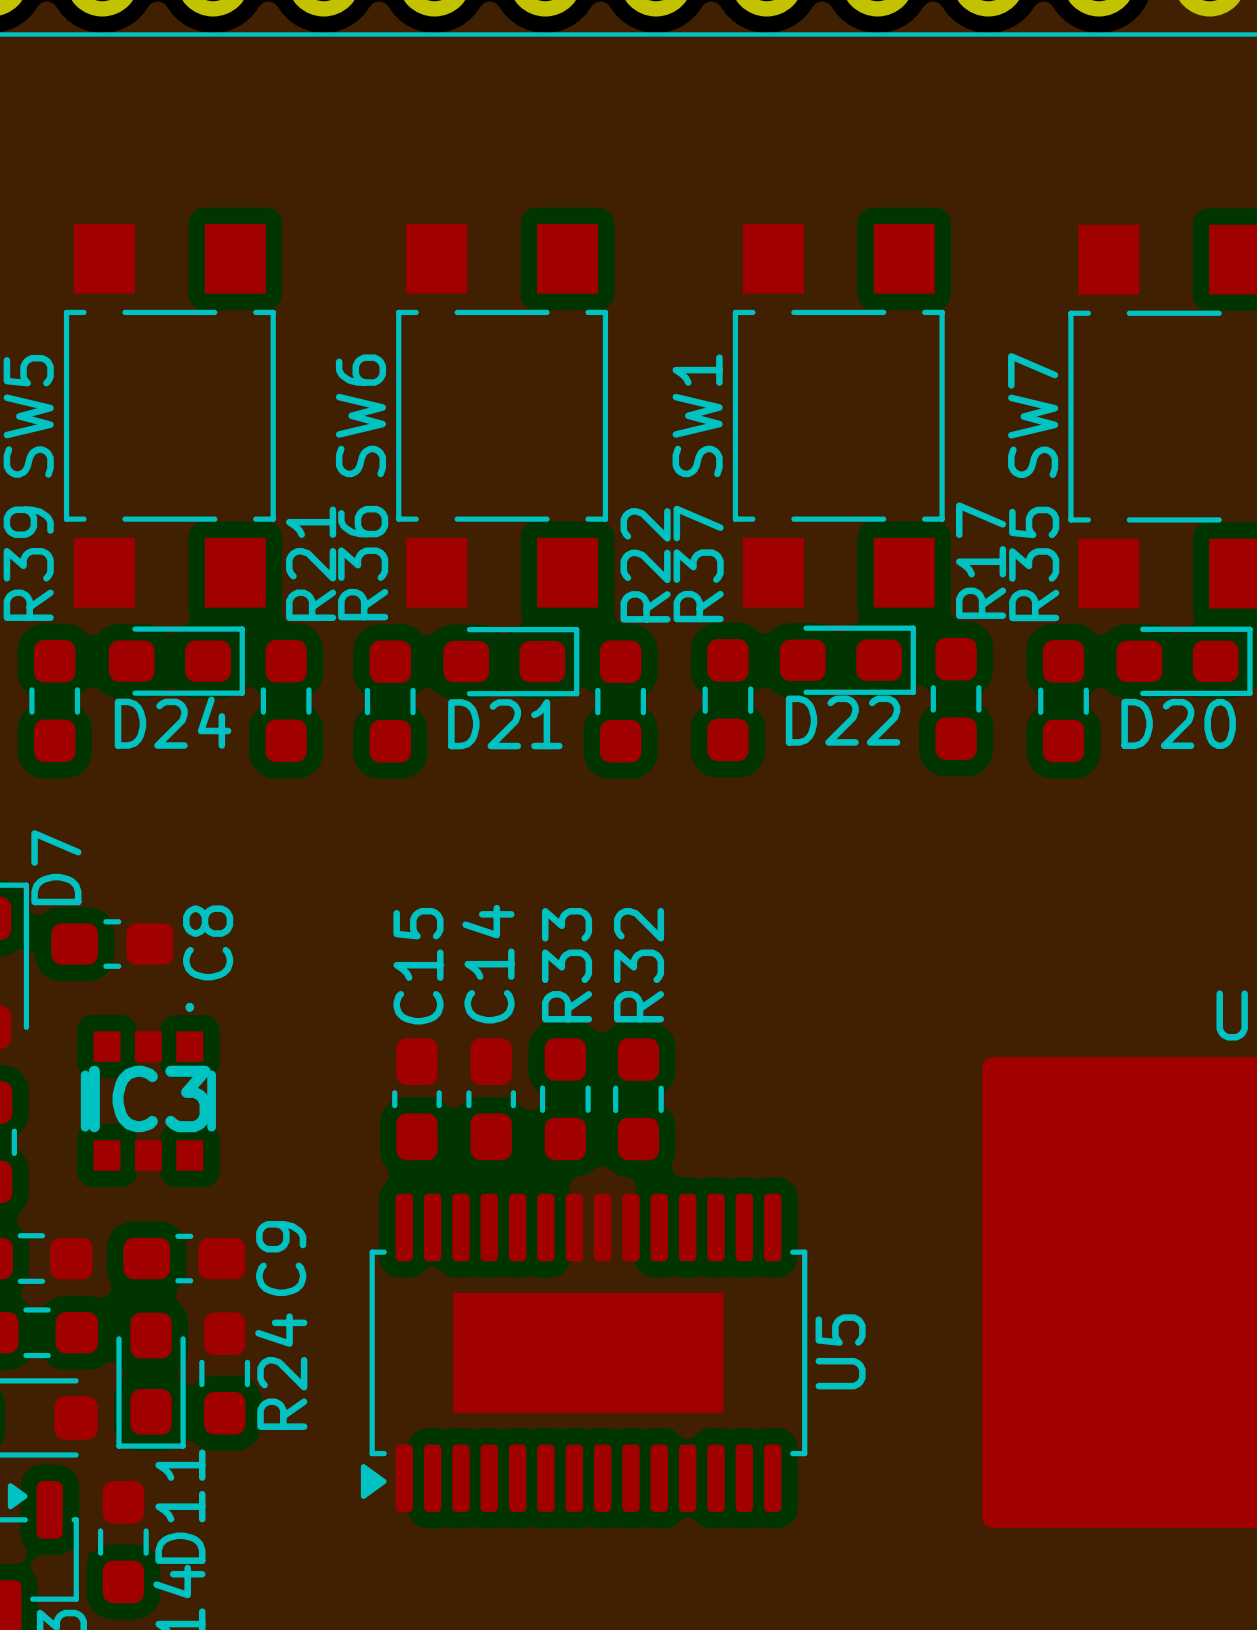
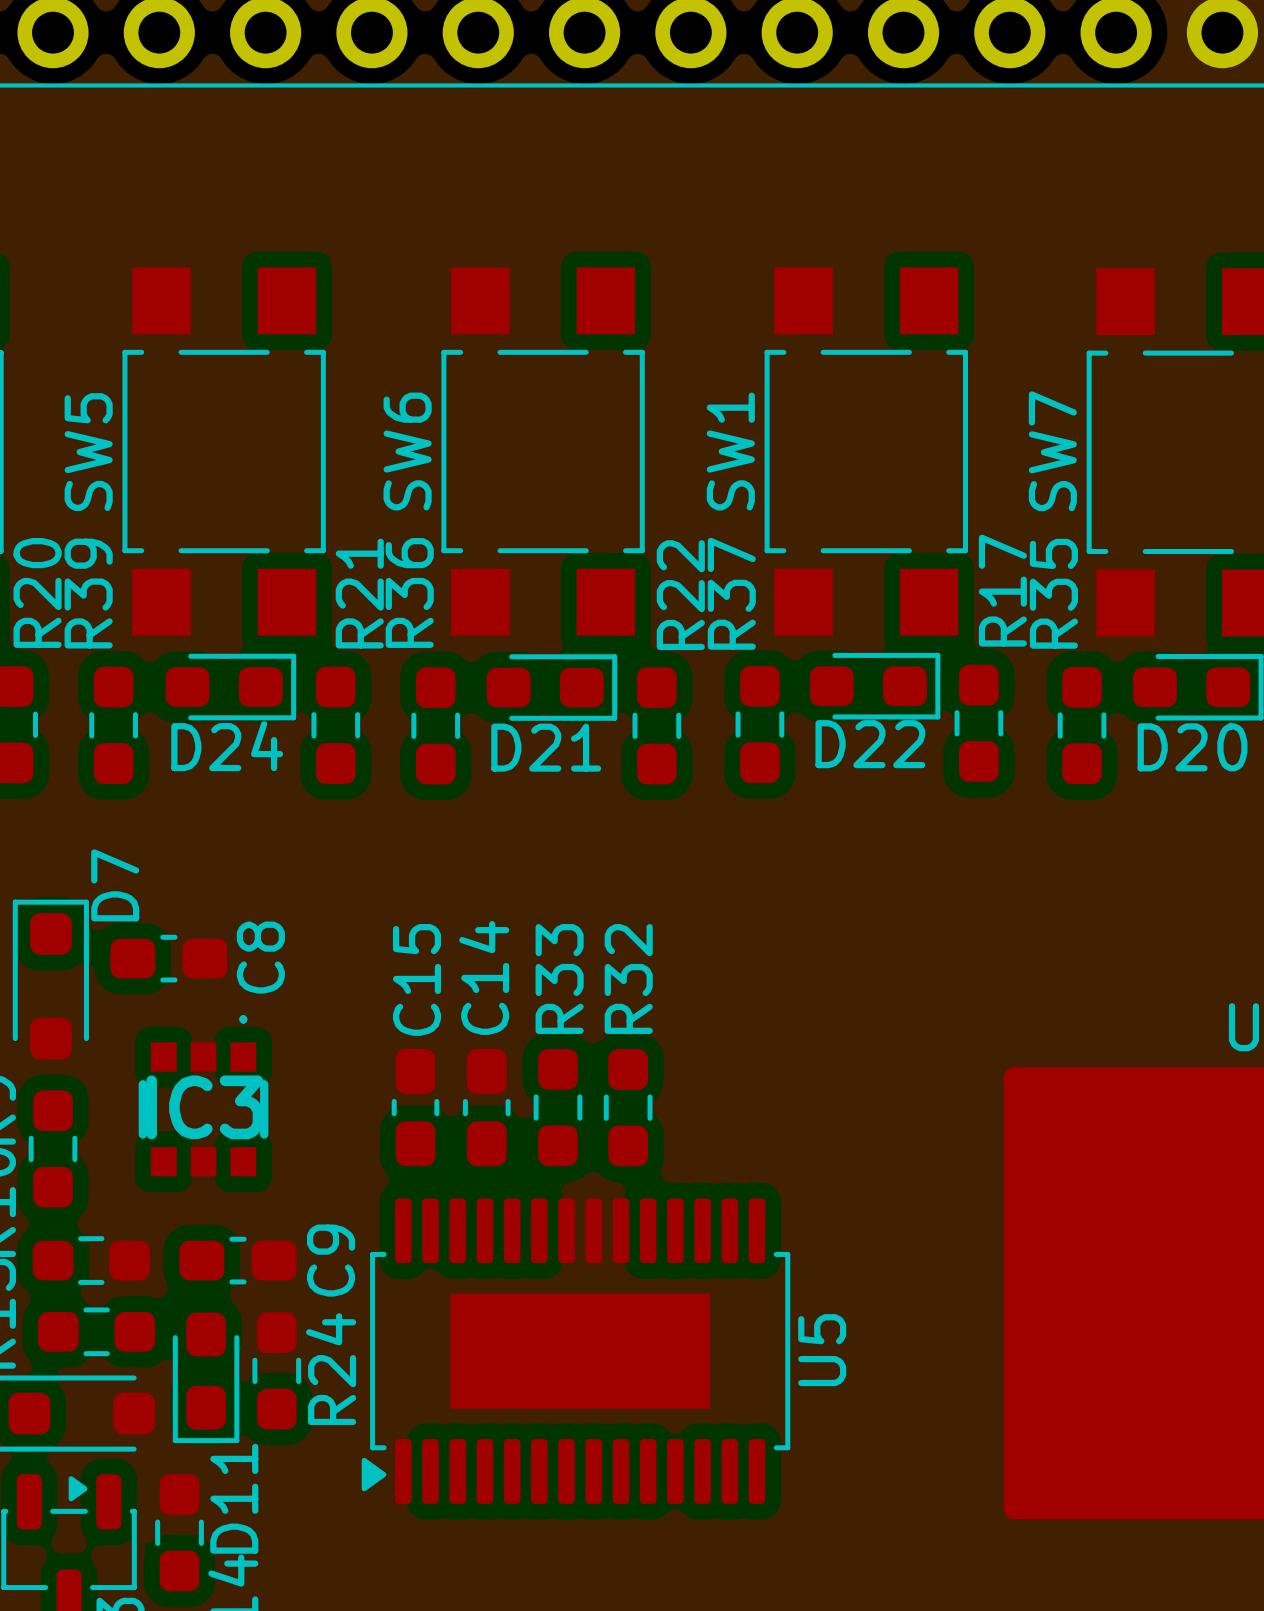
C15 position: (416, 1099) -> (415, 1107)
C14 position: (491, 1099) -> (486, 1107)
R33 position: (565, 1099) -> (557, 1107)
R32 position: (638, 1099) -> (628, 1107)
U5 position: (584, 1352) -> (575, 1351)

